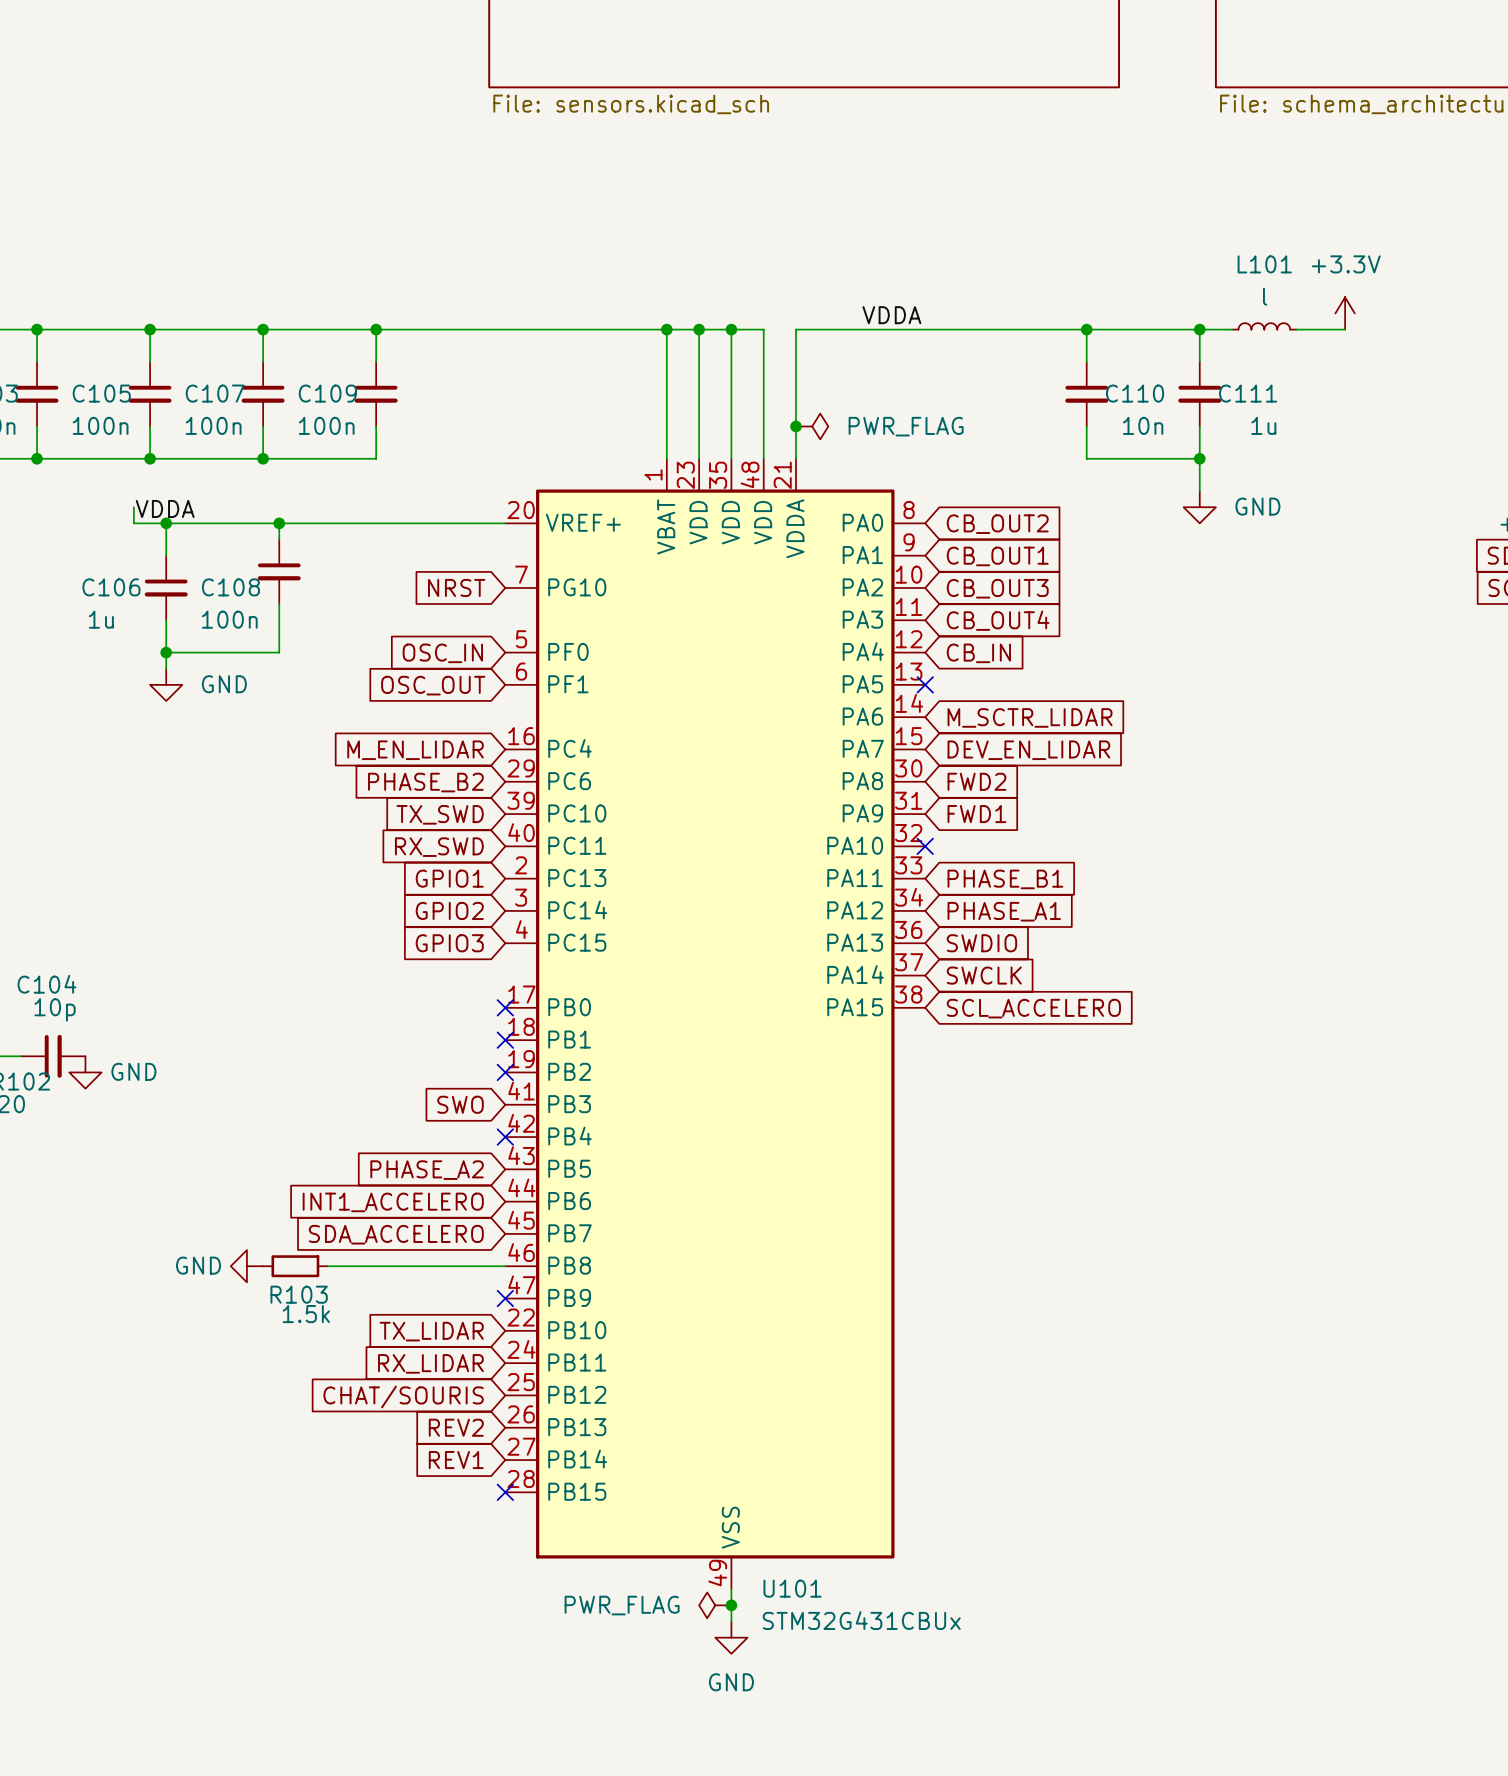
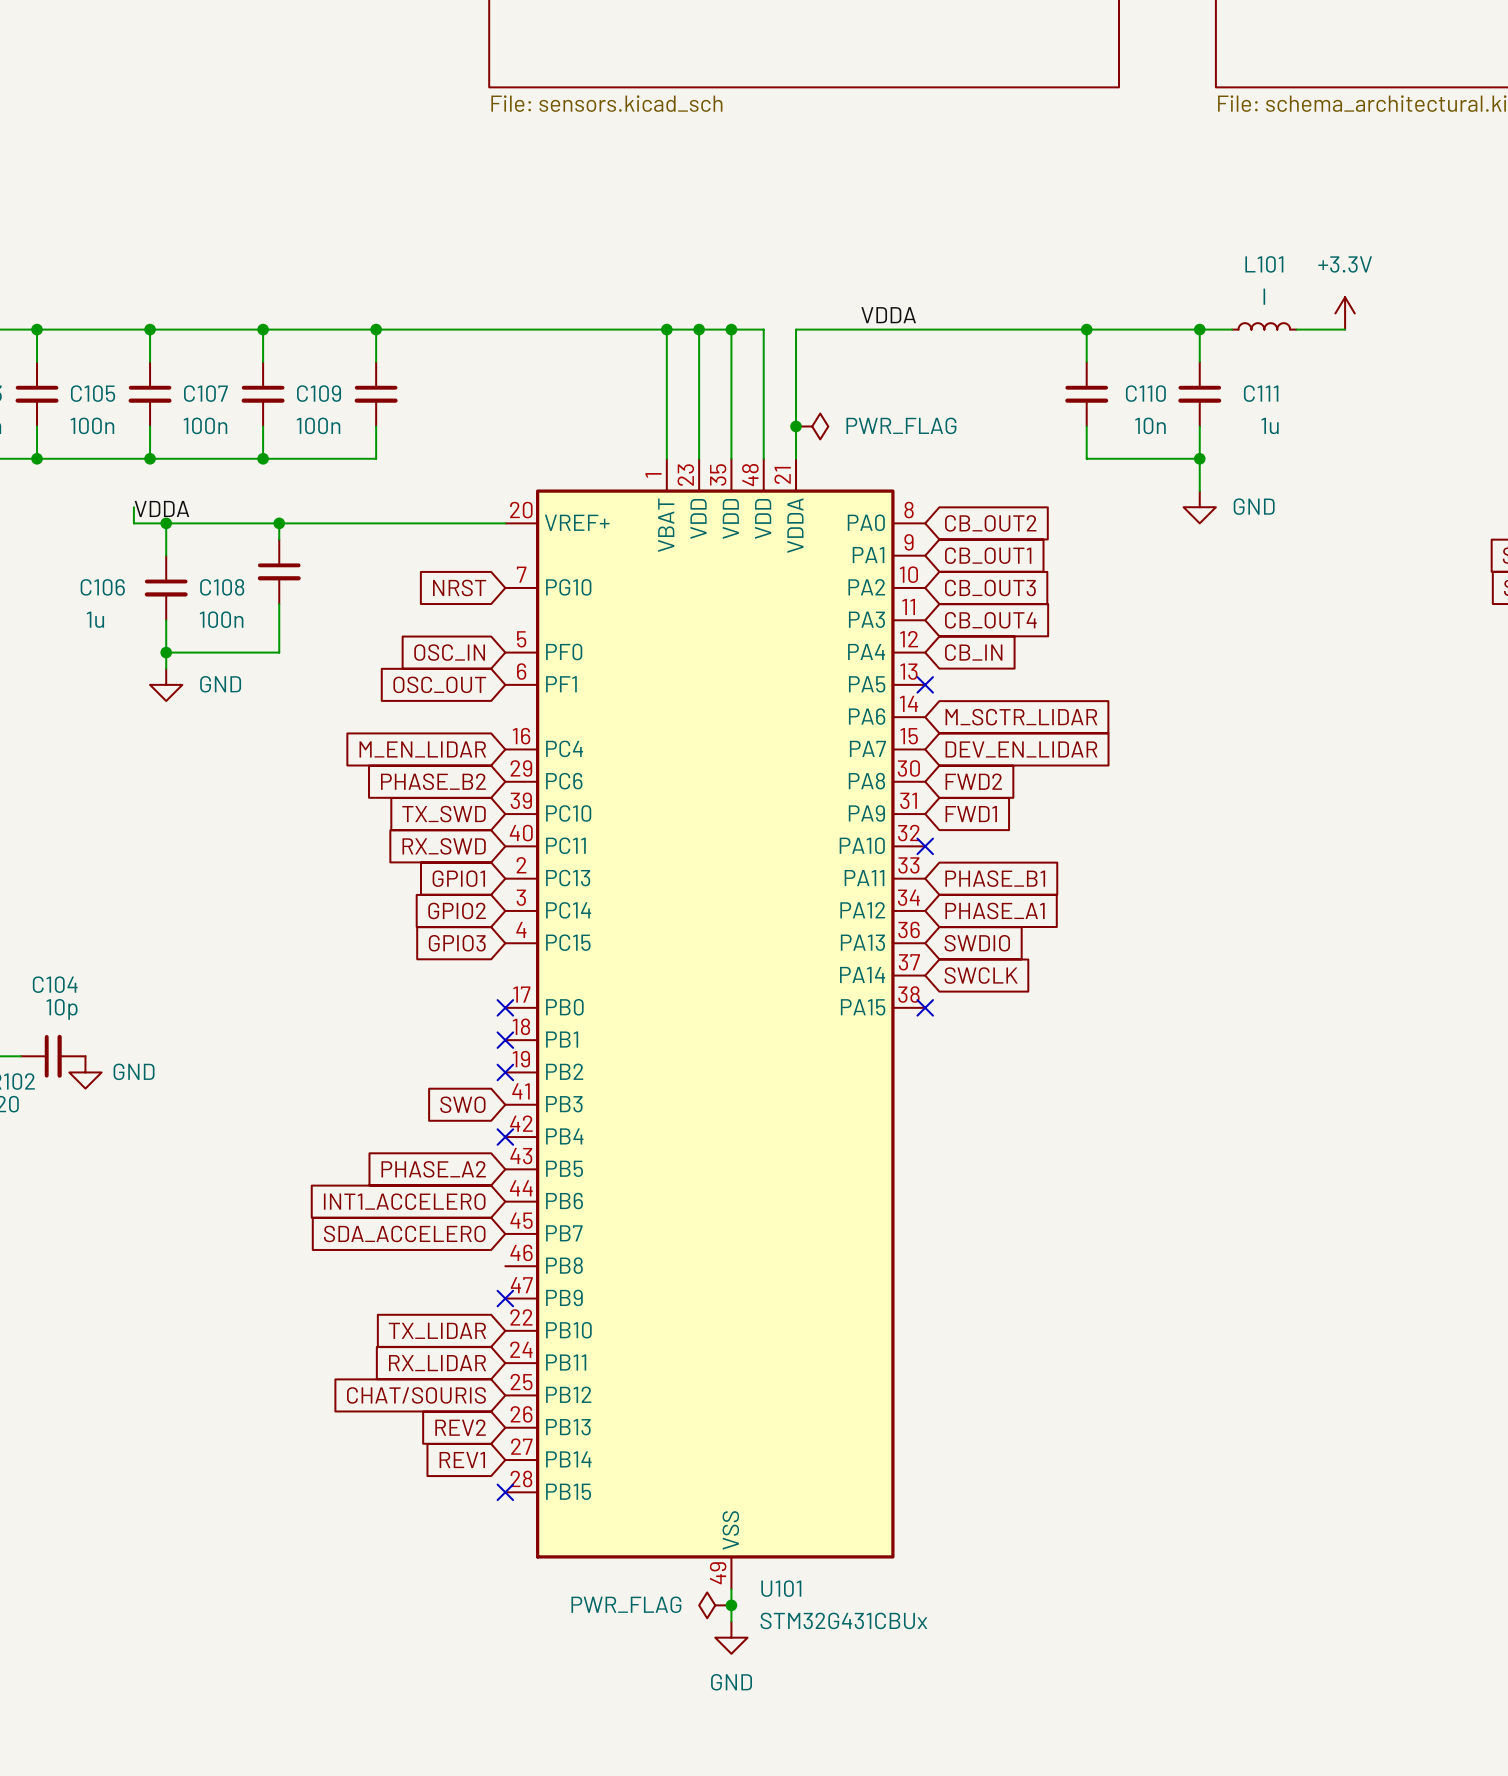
no-connect mark: none -> (925, 1007)
global label: SCL_ACCELERO (1033, 1008) -> none
power symbol: GND (246, 1266) -> none
R103: 1.5k (295, 1266) -> none
wire: (327, 1266) (505, 1266) -> none

